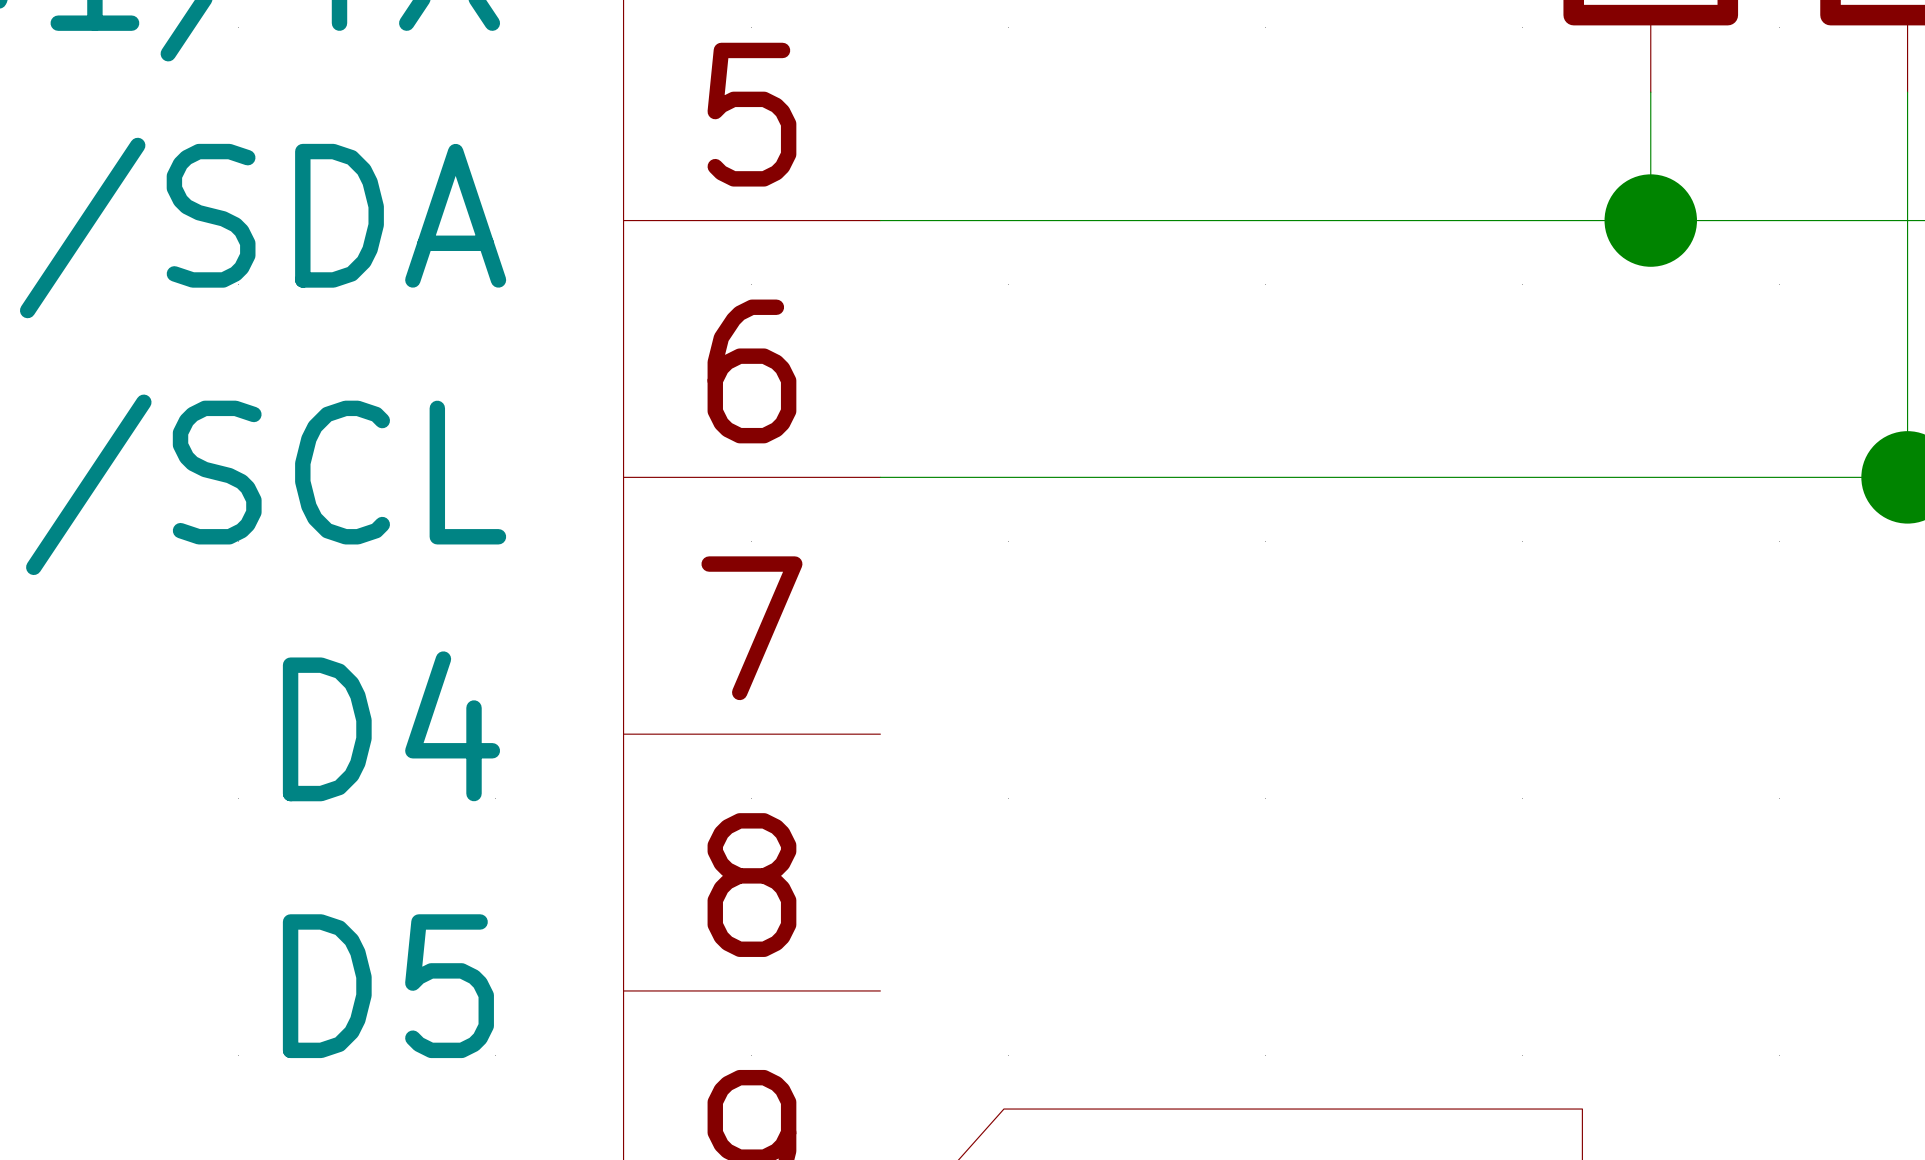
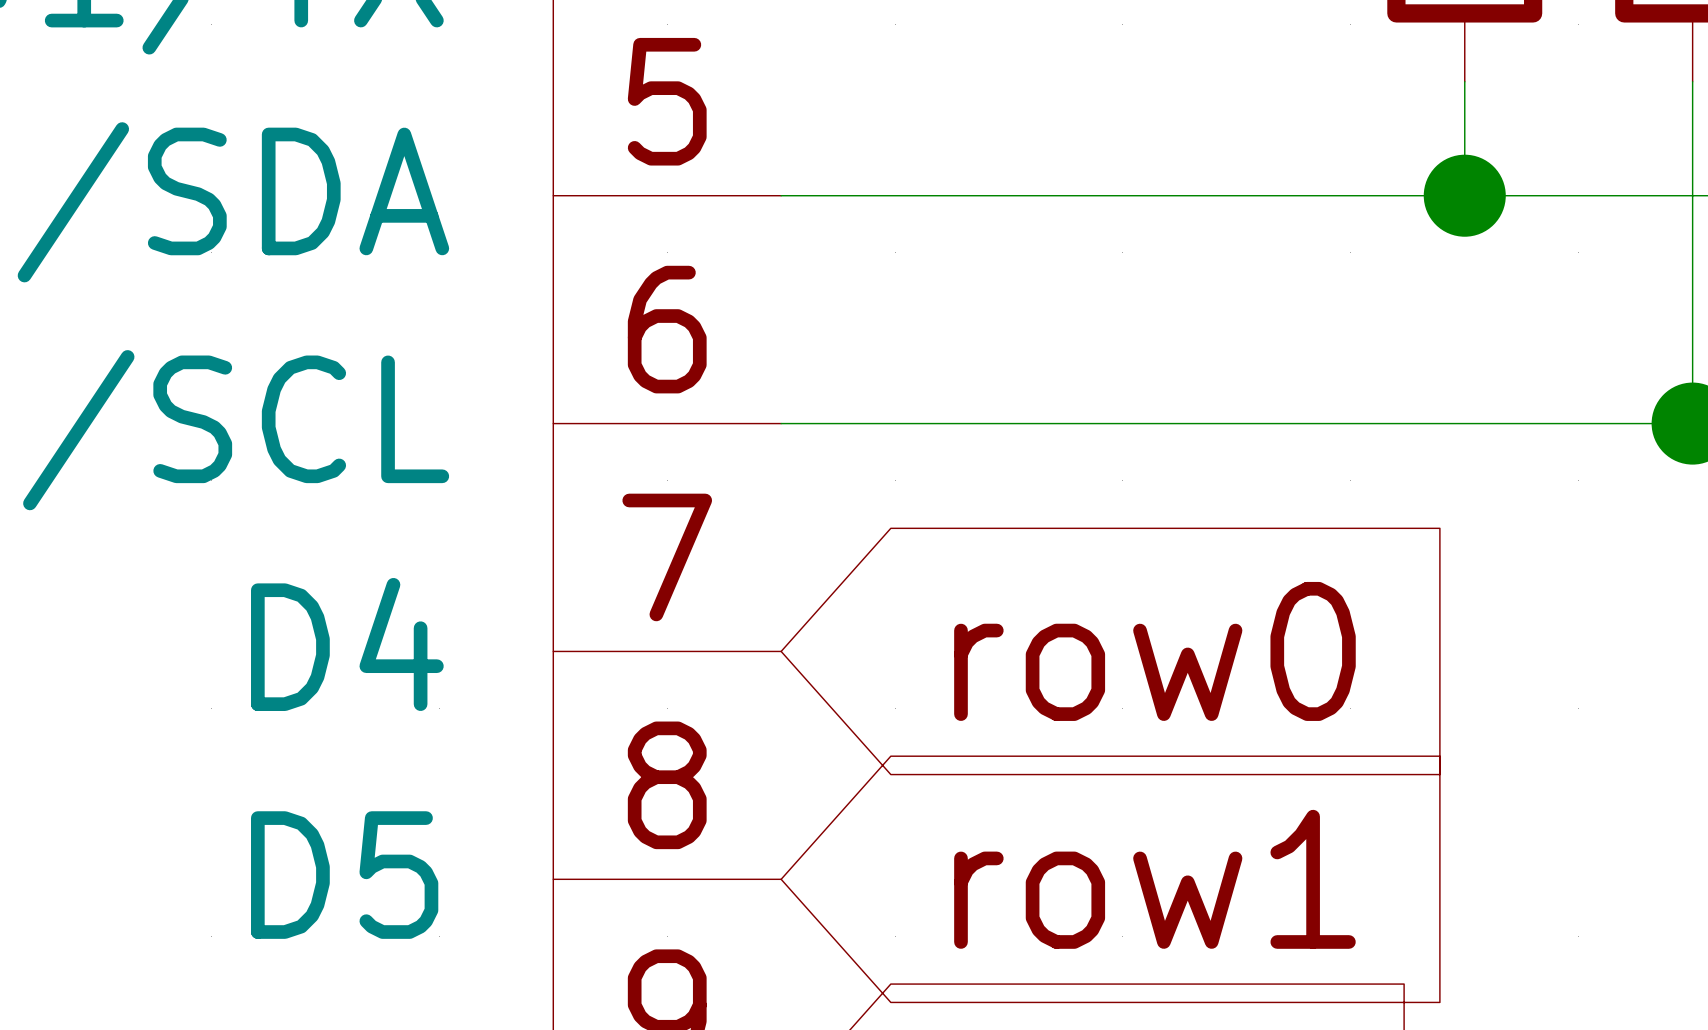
global label: none -> row0 (1154, 651)
global label: none -> row1 (1154, 879)

